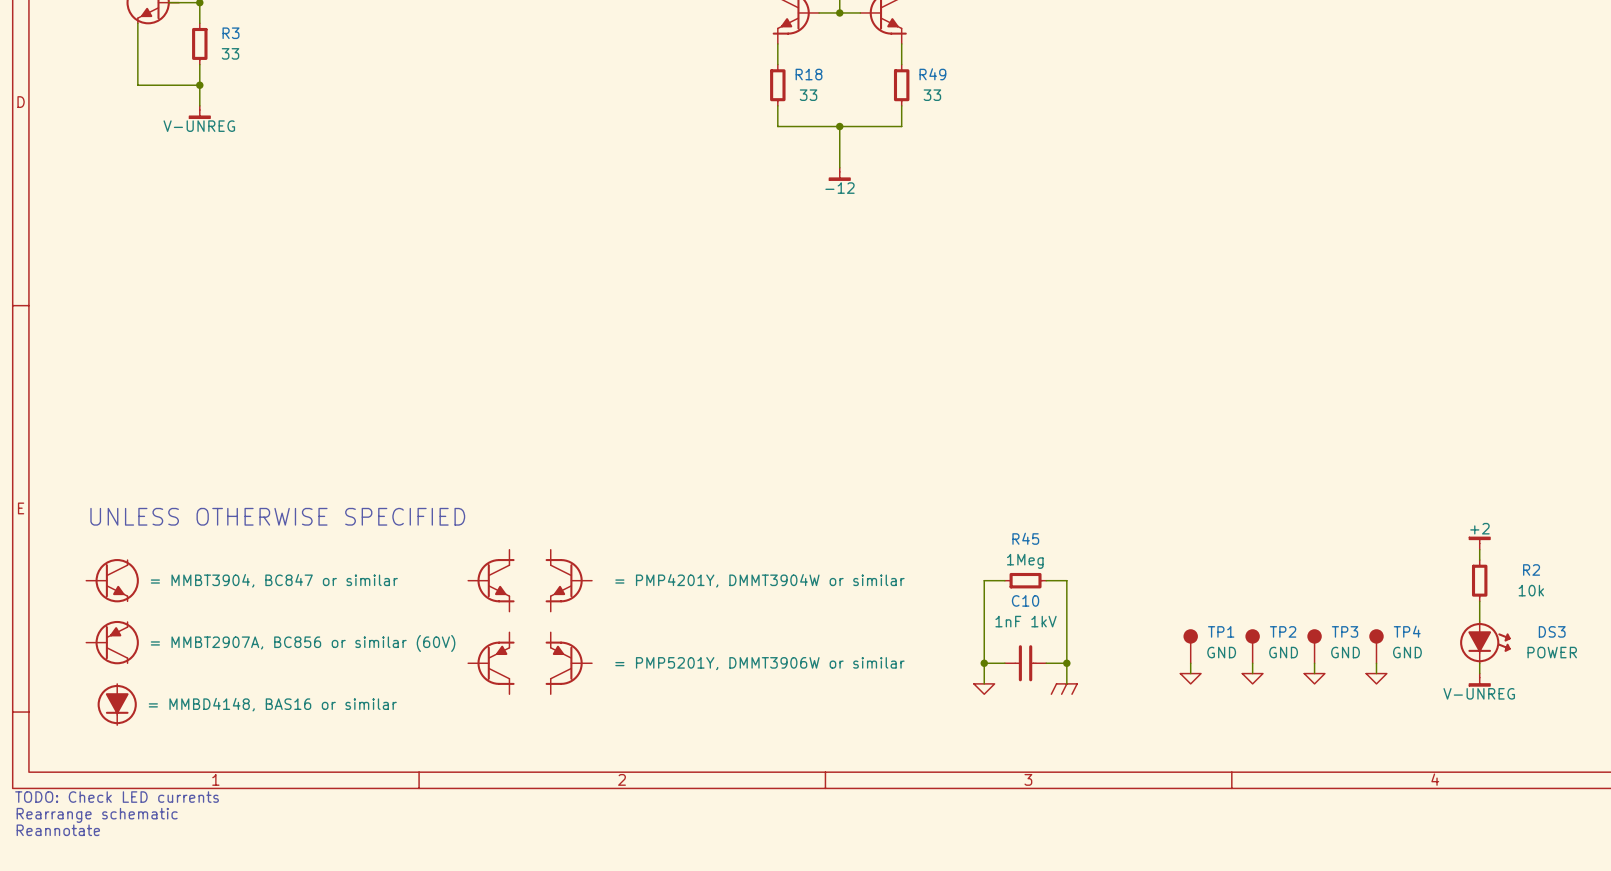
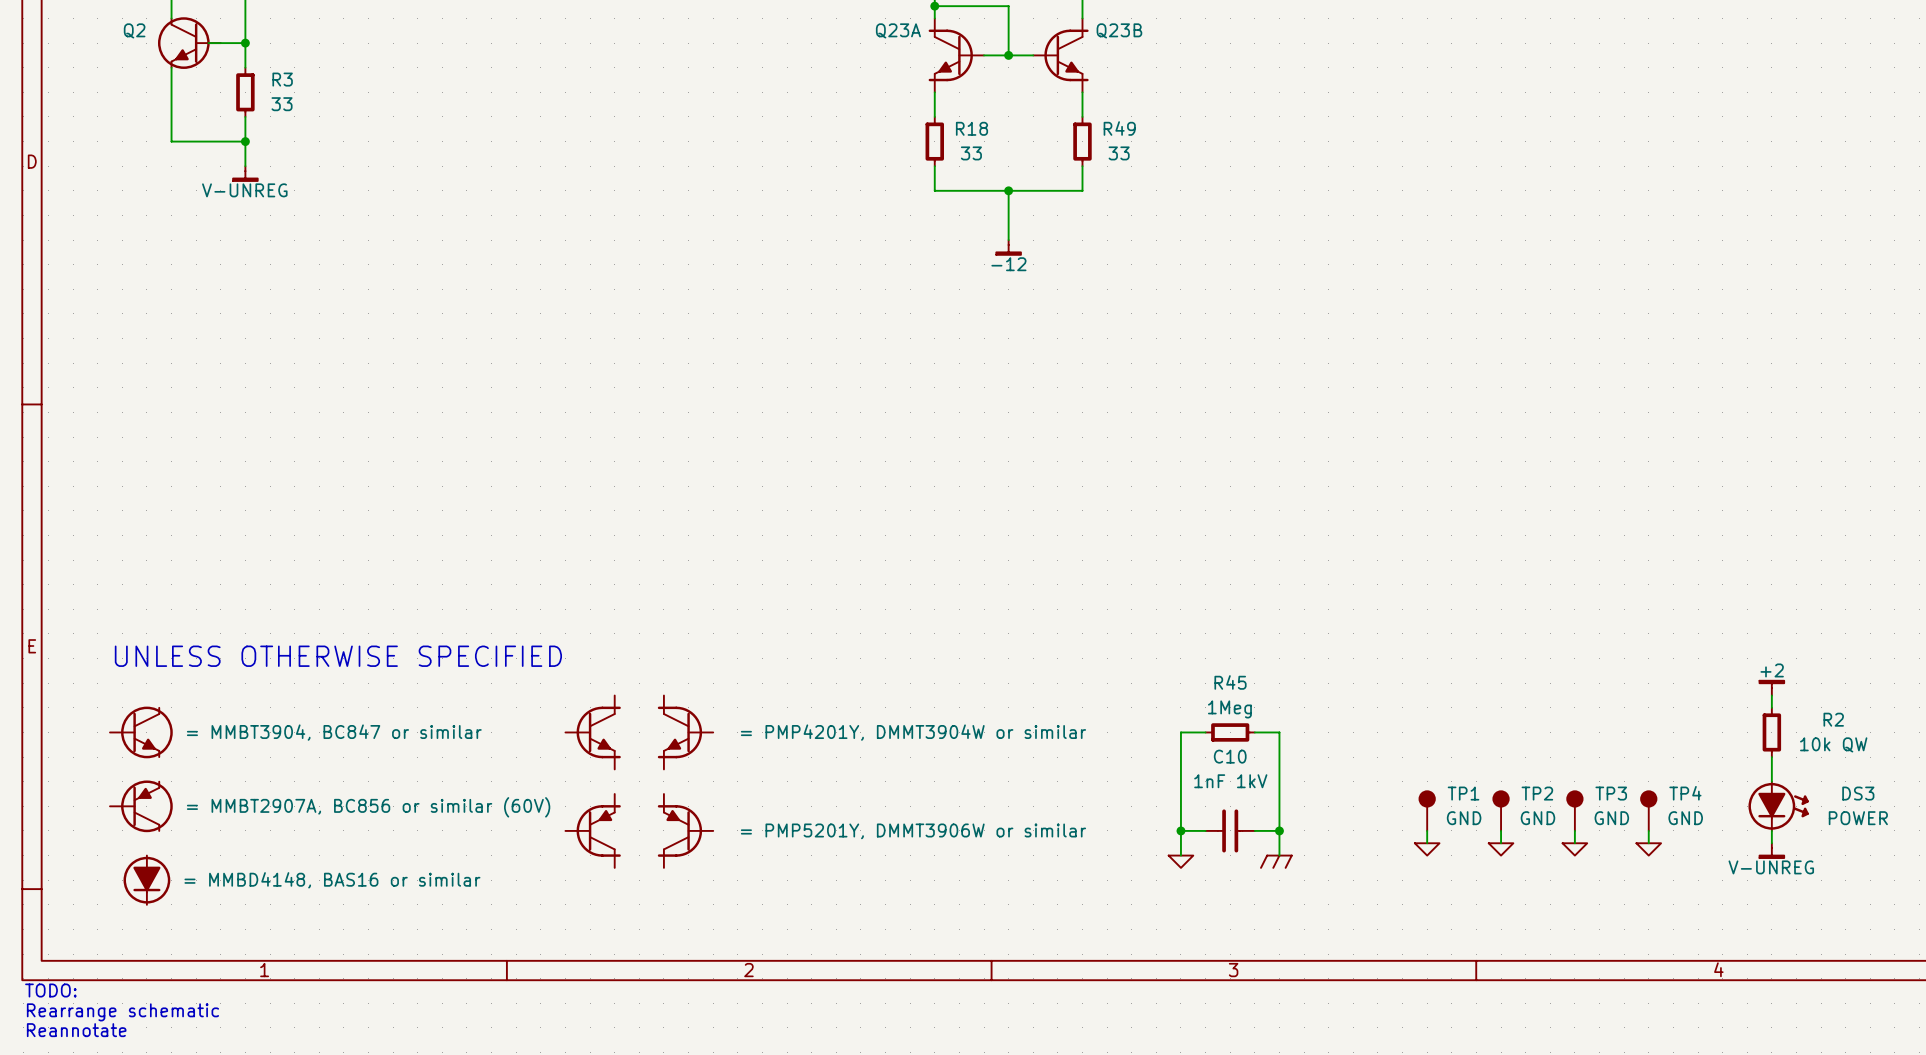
R2 value: 10k (1531, 590) -> 10k QW (1833, 744)
text: TODO: Check LED currents (117, 797) -> TODO: (50, 990)

